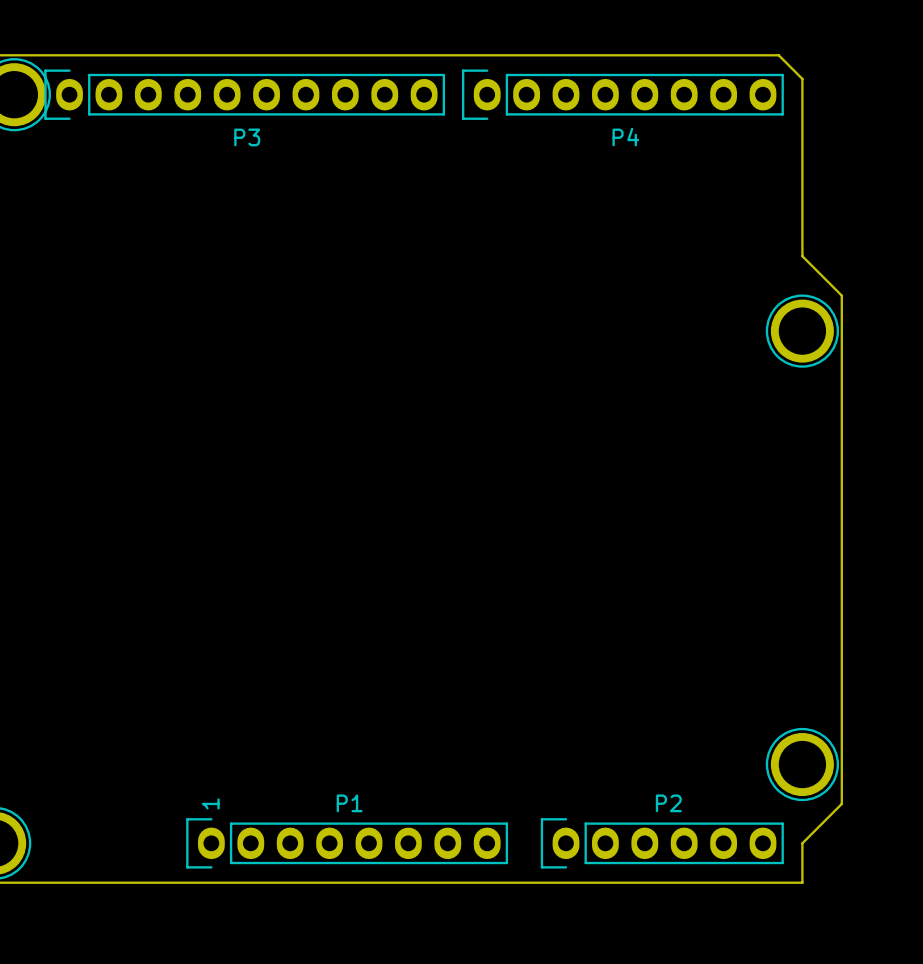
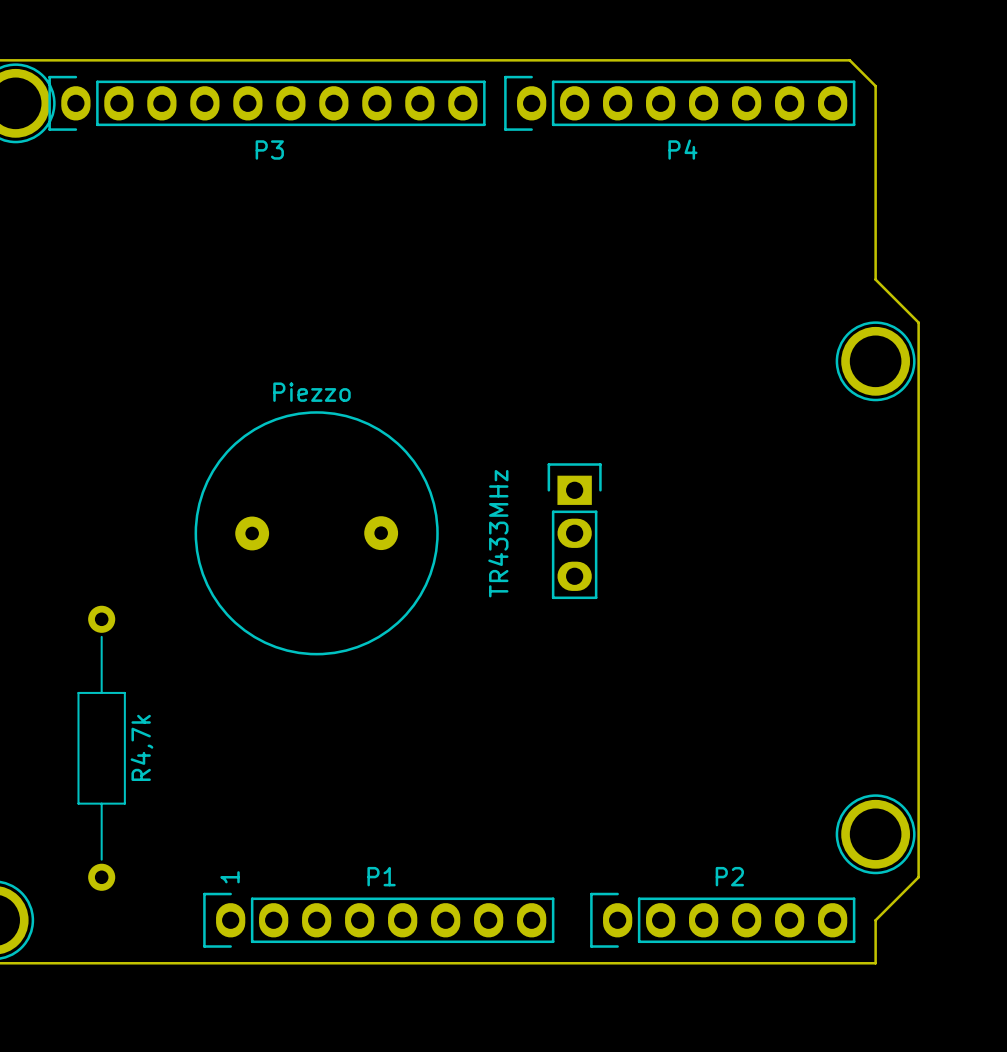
TR433MHz: none -> (574, 531)
Piezzo: none -> (316, 533)
R4,7k: none -> (101, 748)

